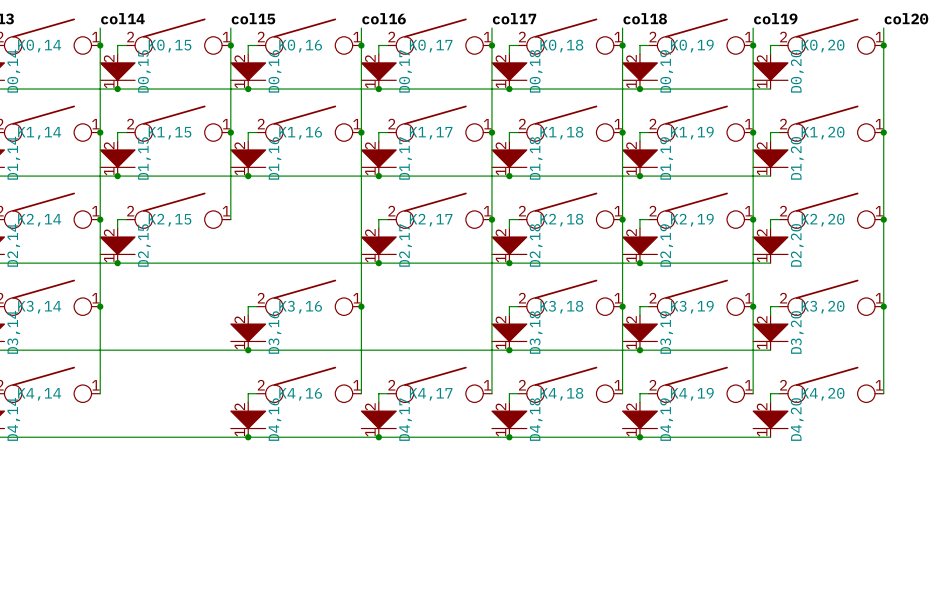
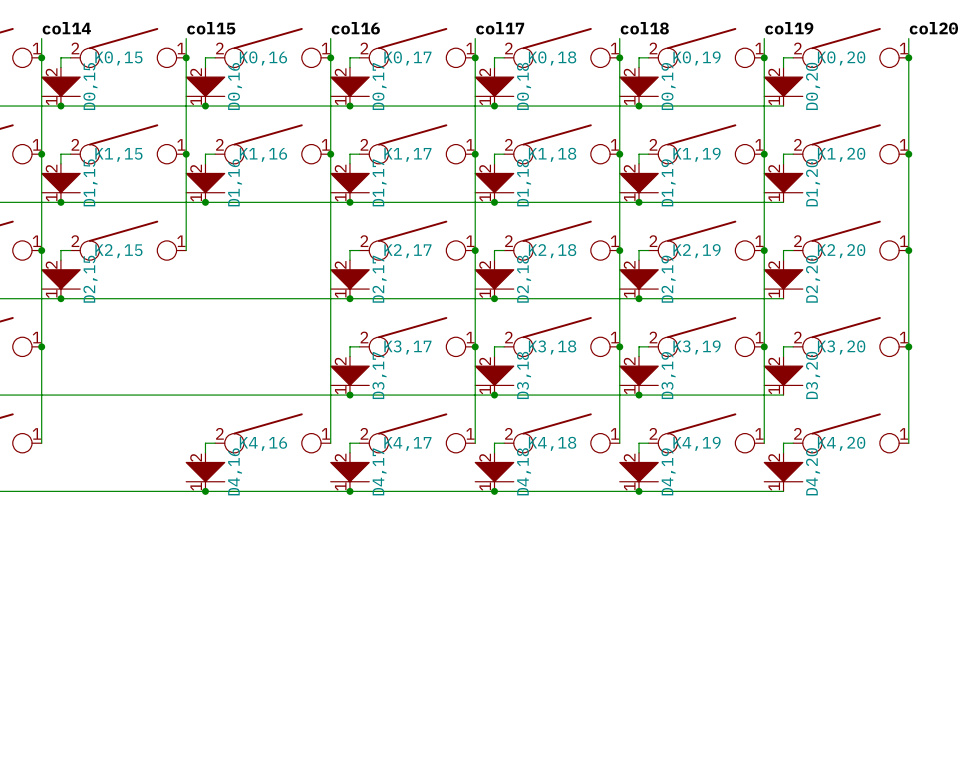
K3,16: (309, 297) -> none
K3,17: none -> (417, 336)
wire: (256, 306) (248, 306) (248, 315) -> (359, 346) (349, 346) (349, 356)
junction: (361, 306) -> none
junction: none -> (475, 346)
D3,16: (248, 332) -> none
D3,17: none -> (349, 375)
junction: (248, 350) -> none
junction: none -> (349, 395)

